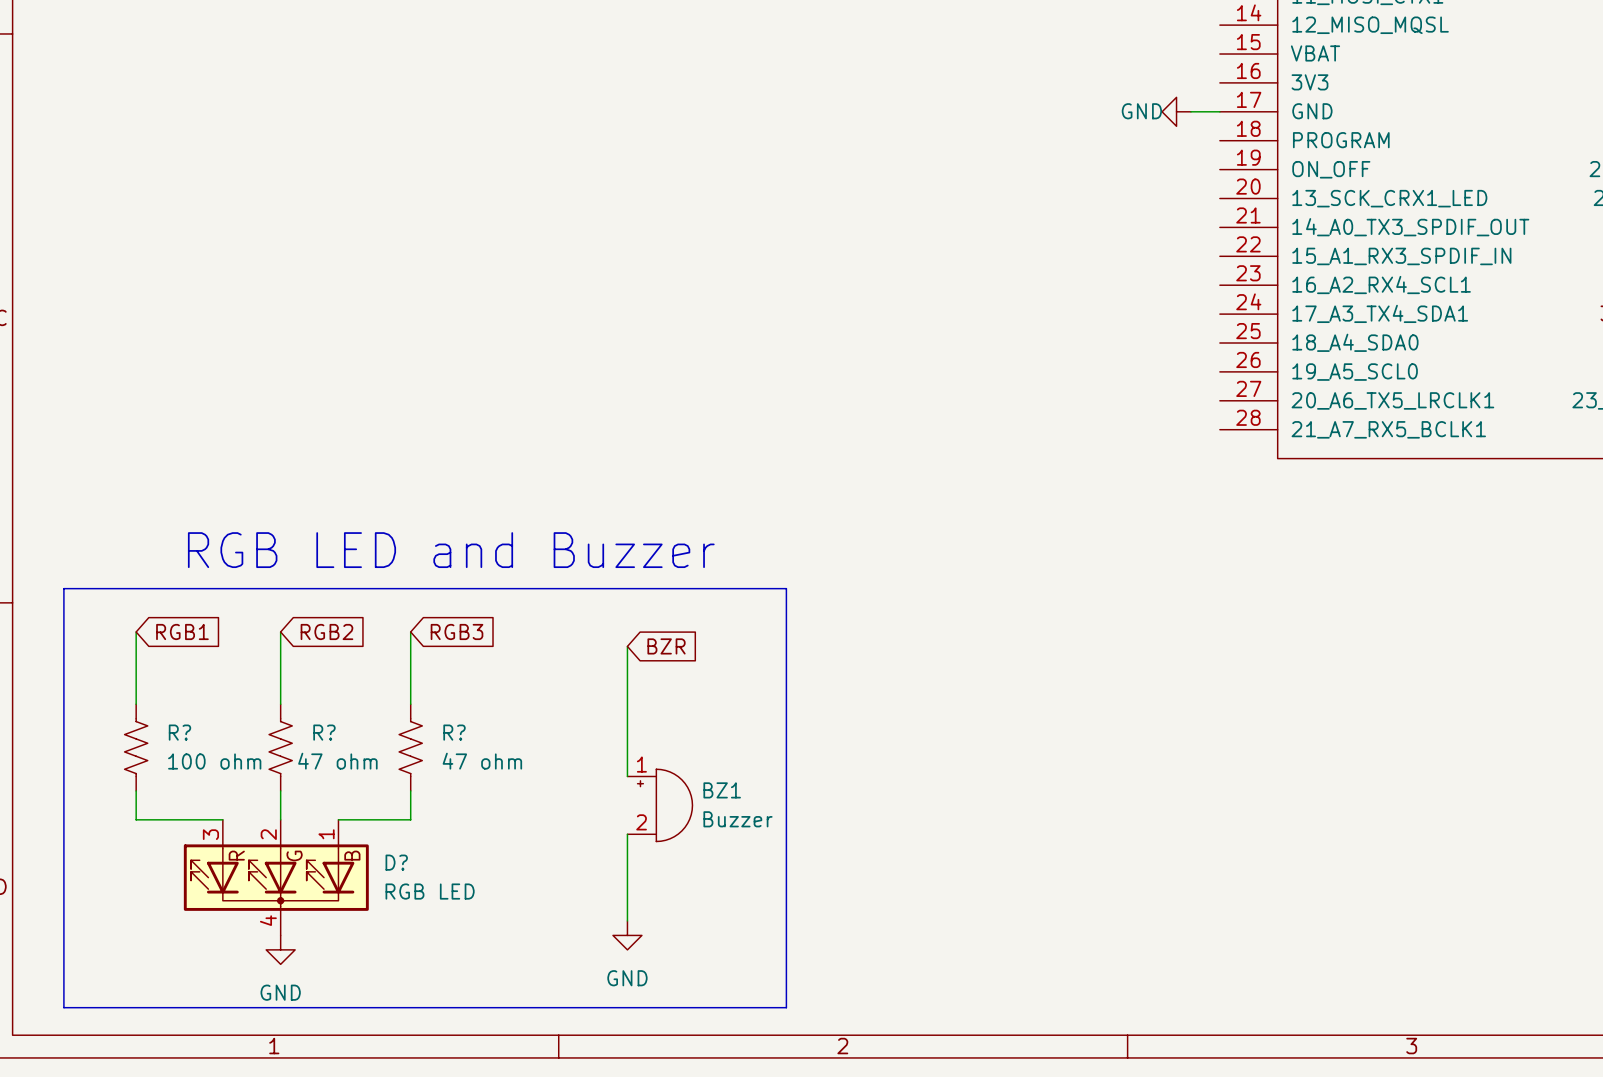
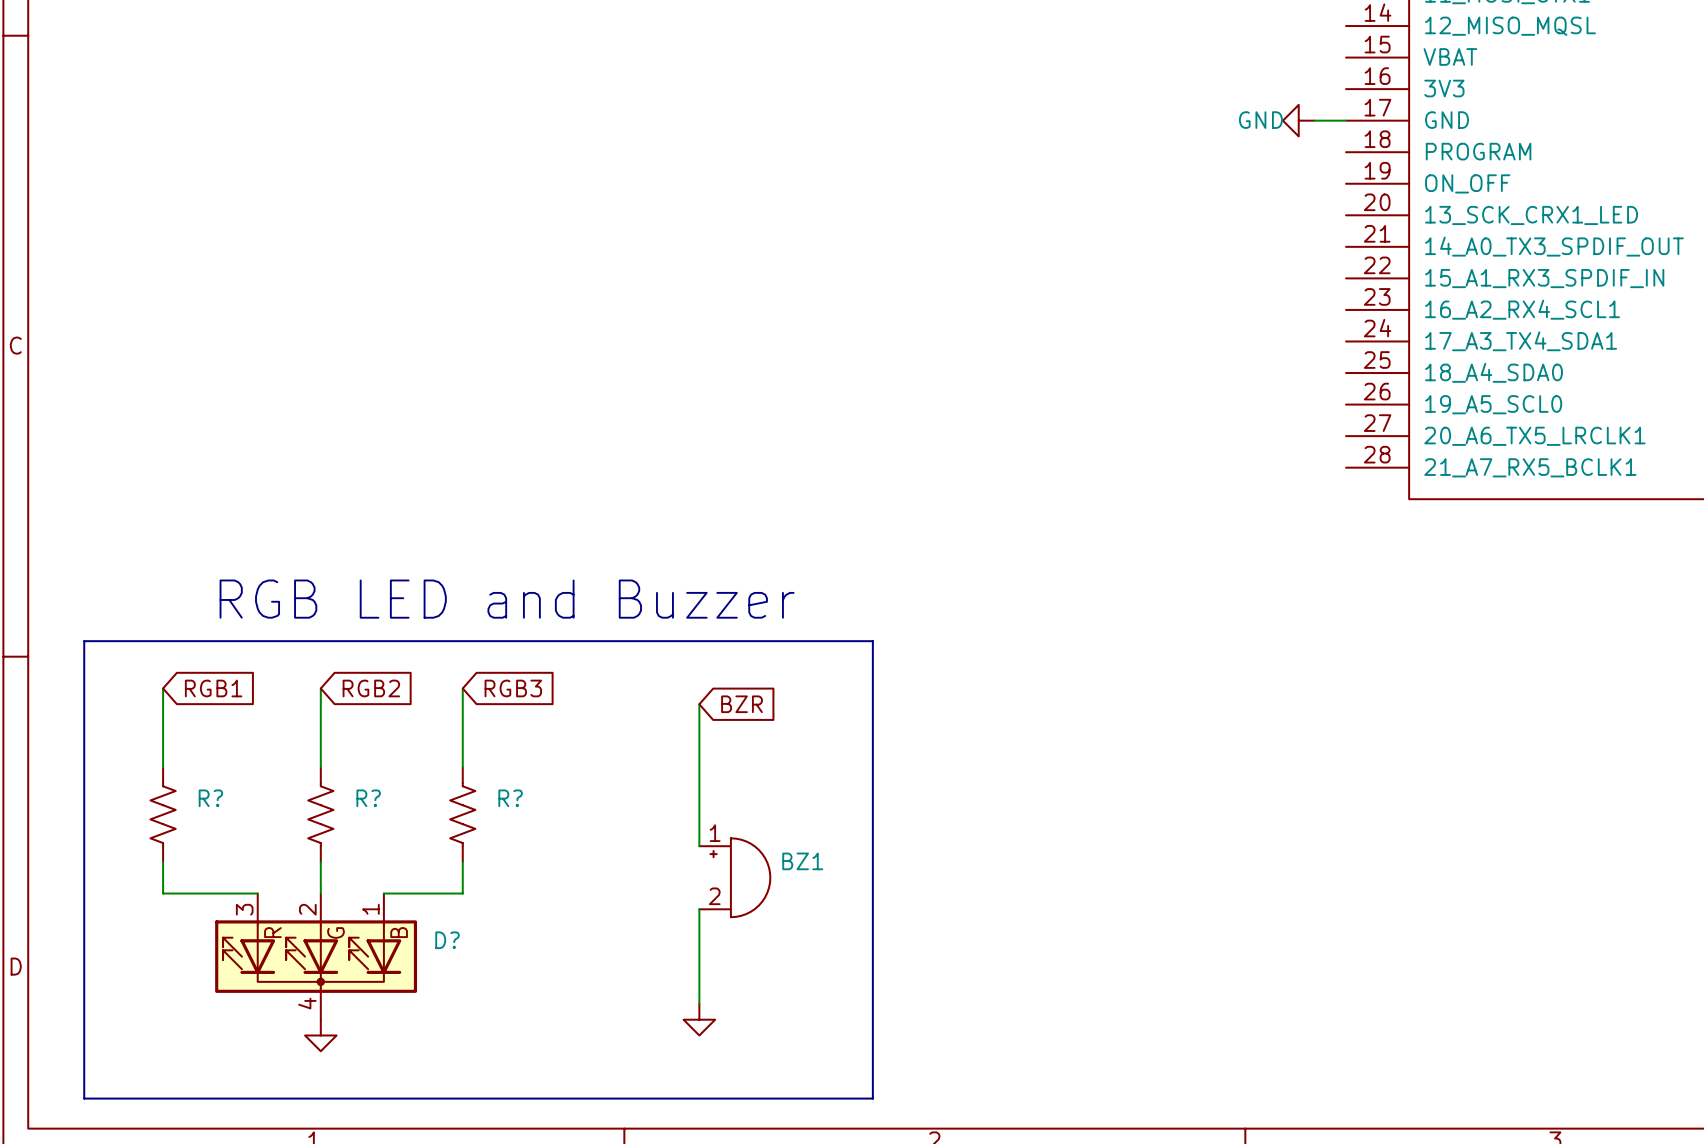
R? value: 100 ohm (214, 761) -> none
R? value: 47 ohm (337, 761) -> none
R? value: 47 ohm (482, 761) -> none
BZ1 value: Buzzer (737, 819) -> none
D? value: RGB LED (430, 891) -> none
power symbol text: GND (627, 978) -> none
power symbol text: GND (280, 992) -> none

